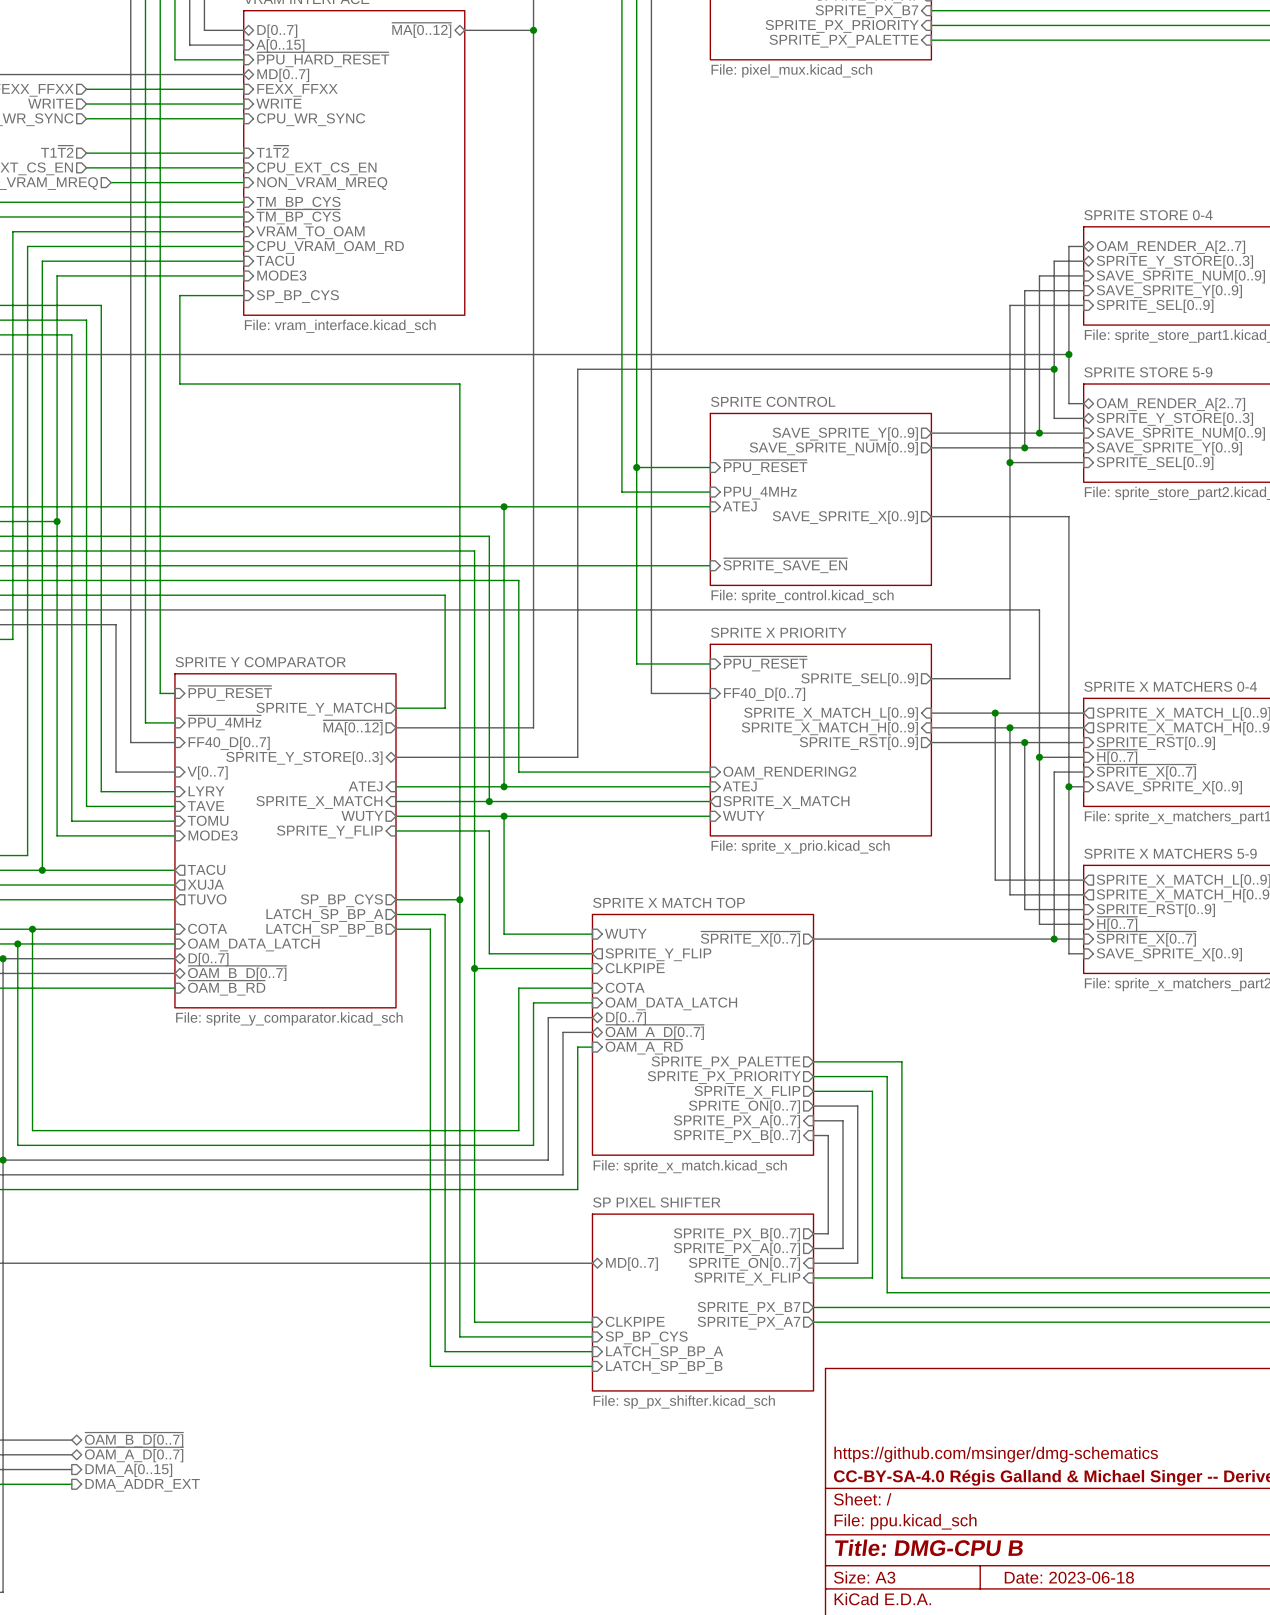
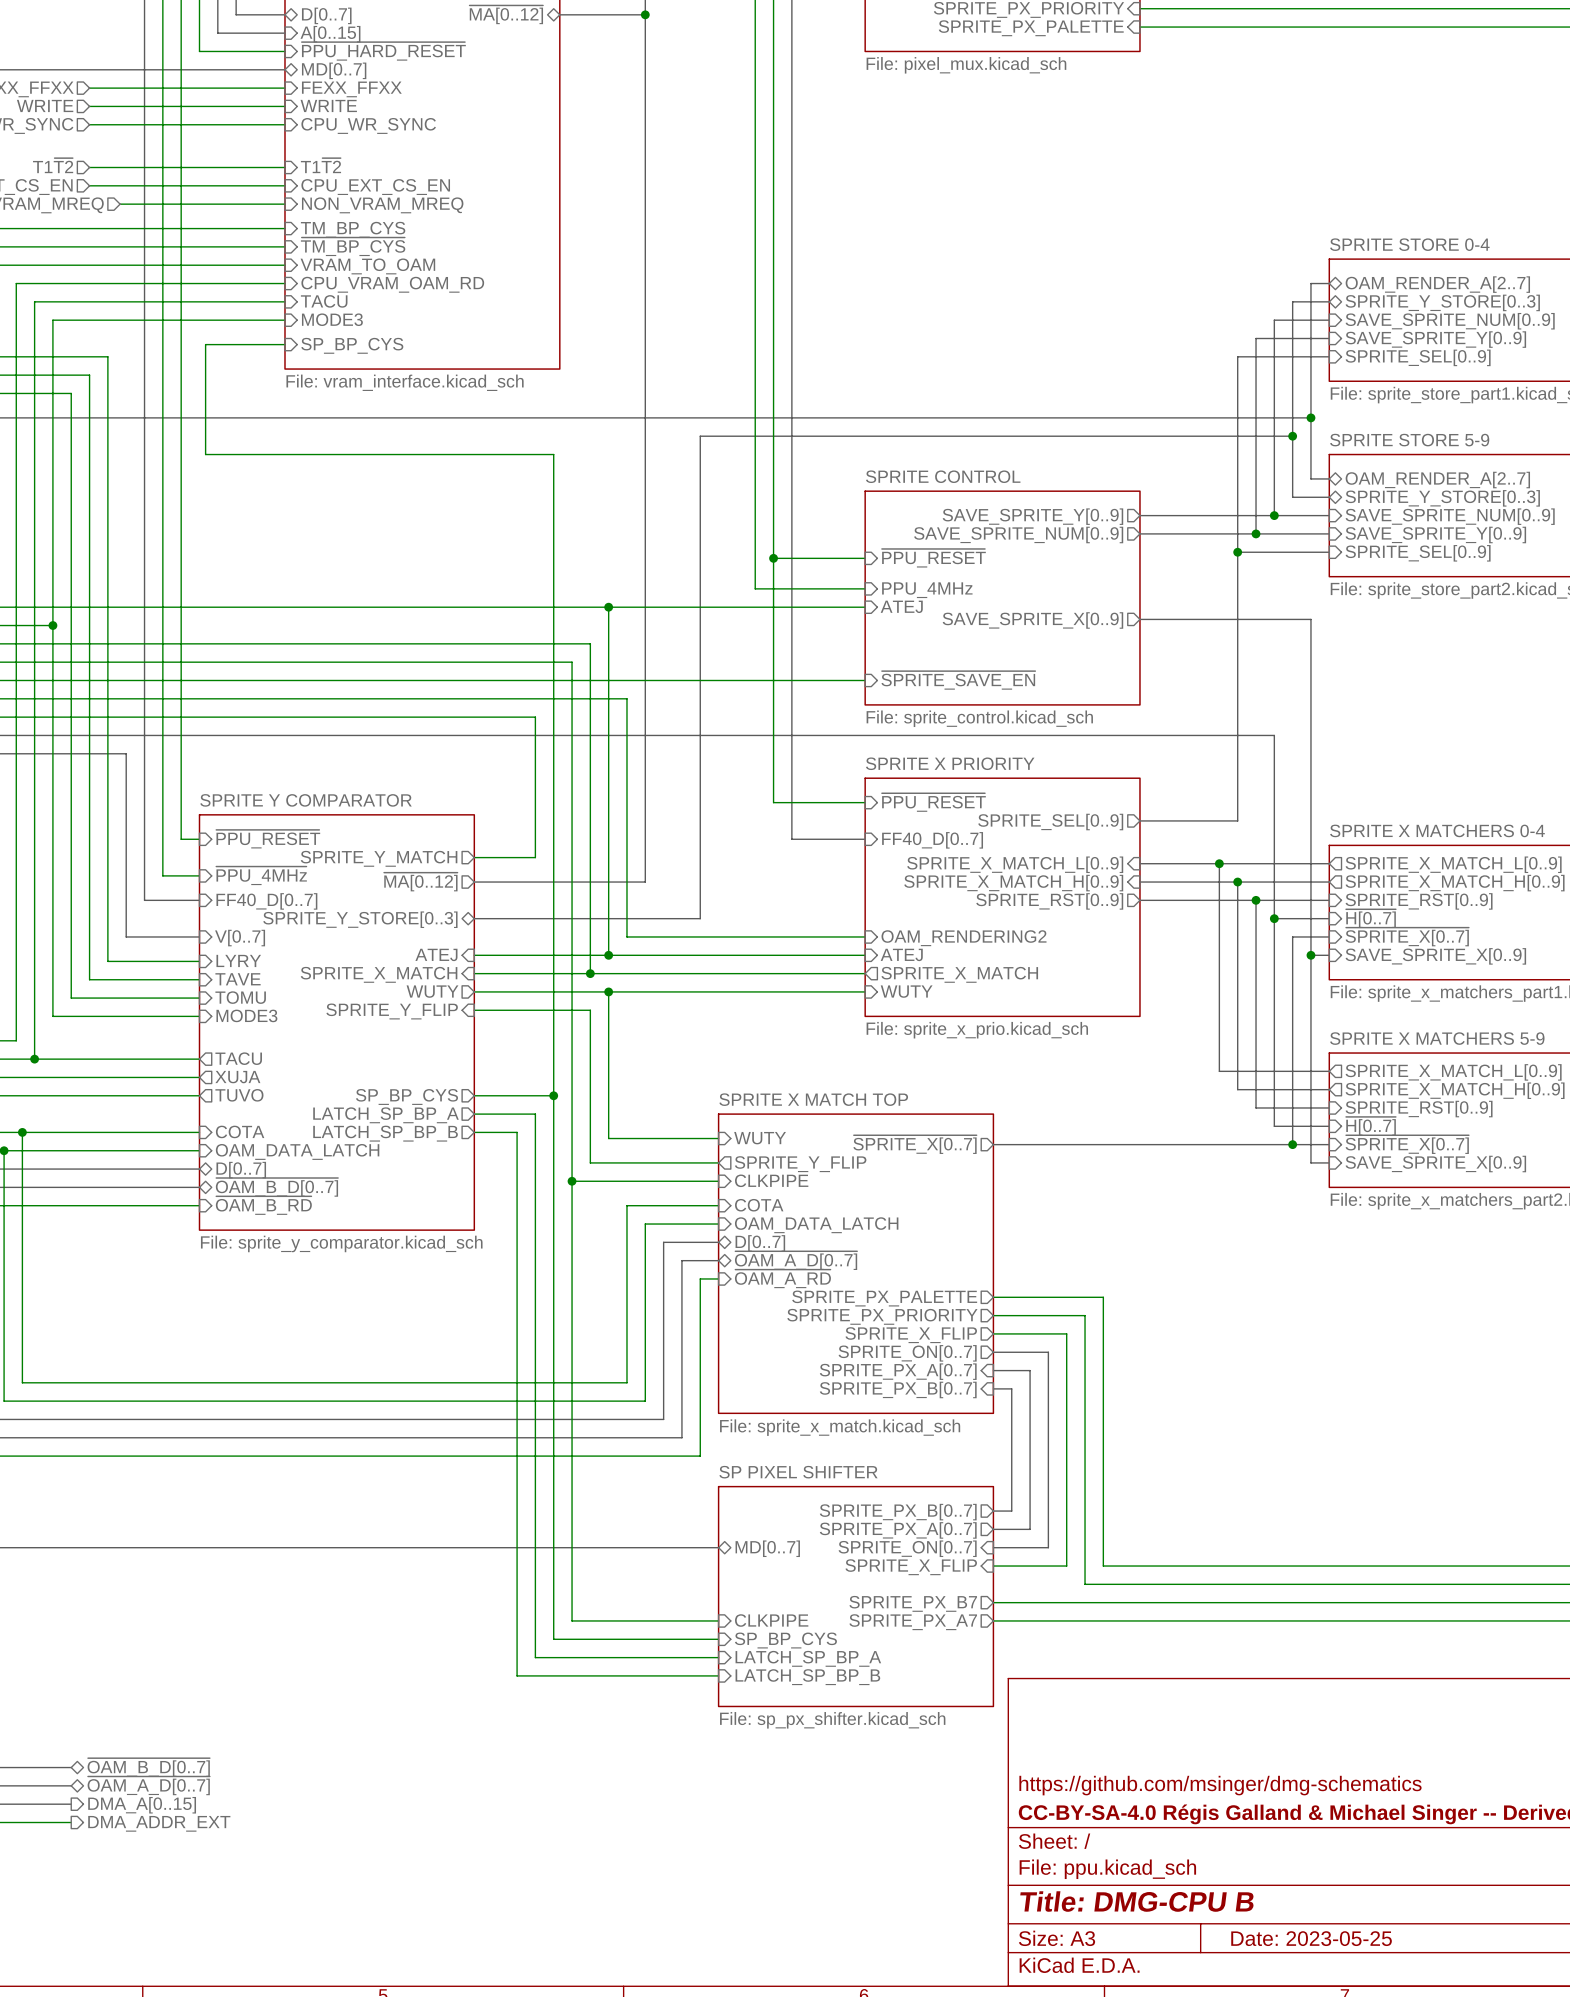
title block: Date: 2023-06-18 (1069, 1577) -> Date: 2023-05-25 (1311, 1938)

